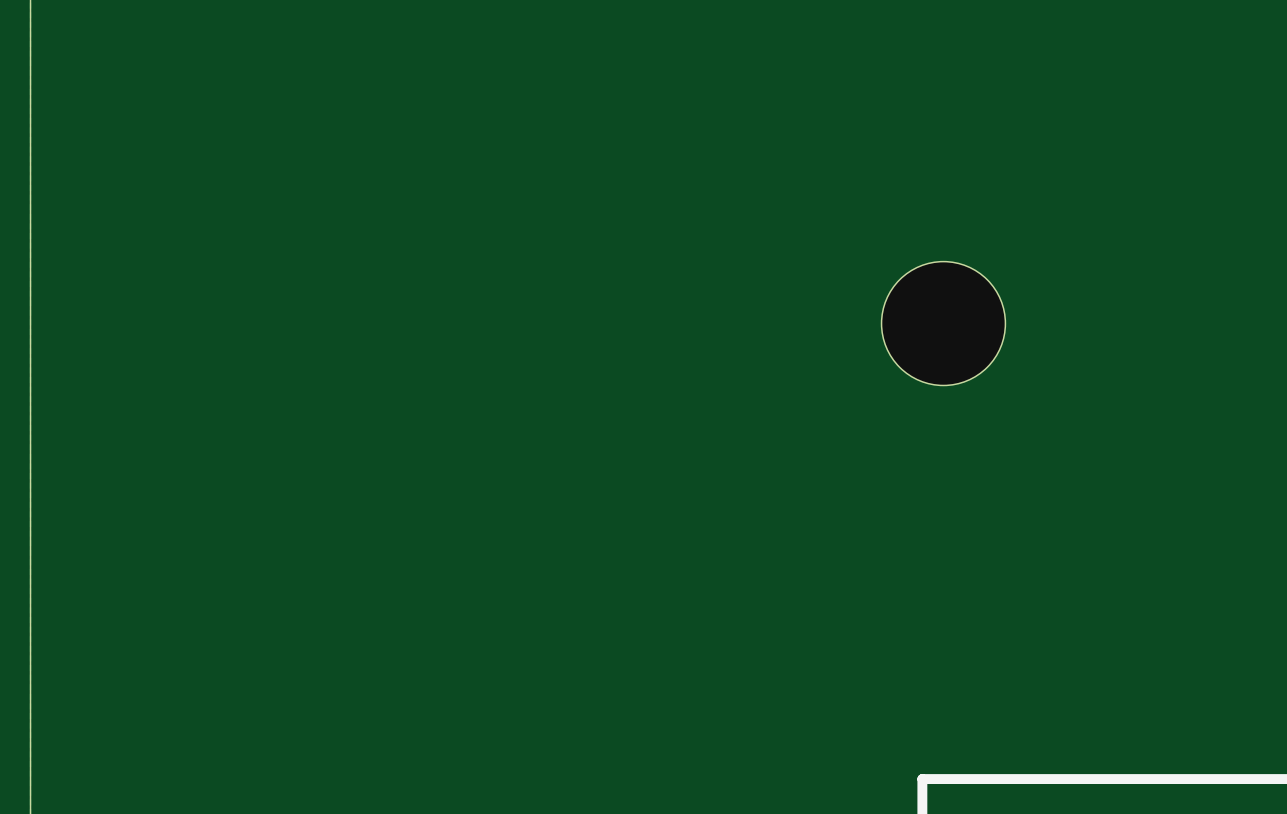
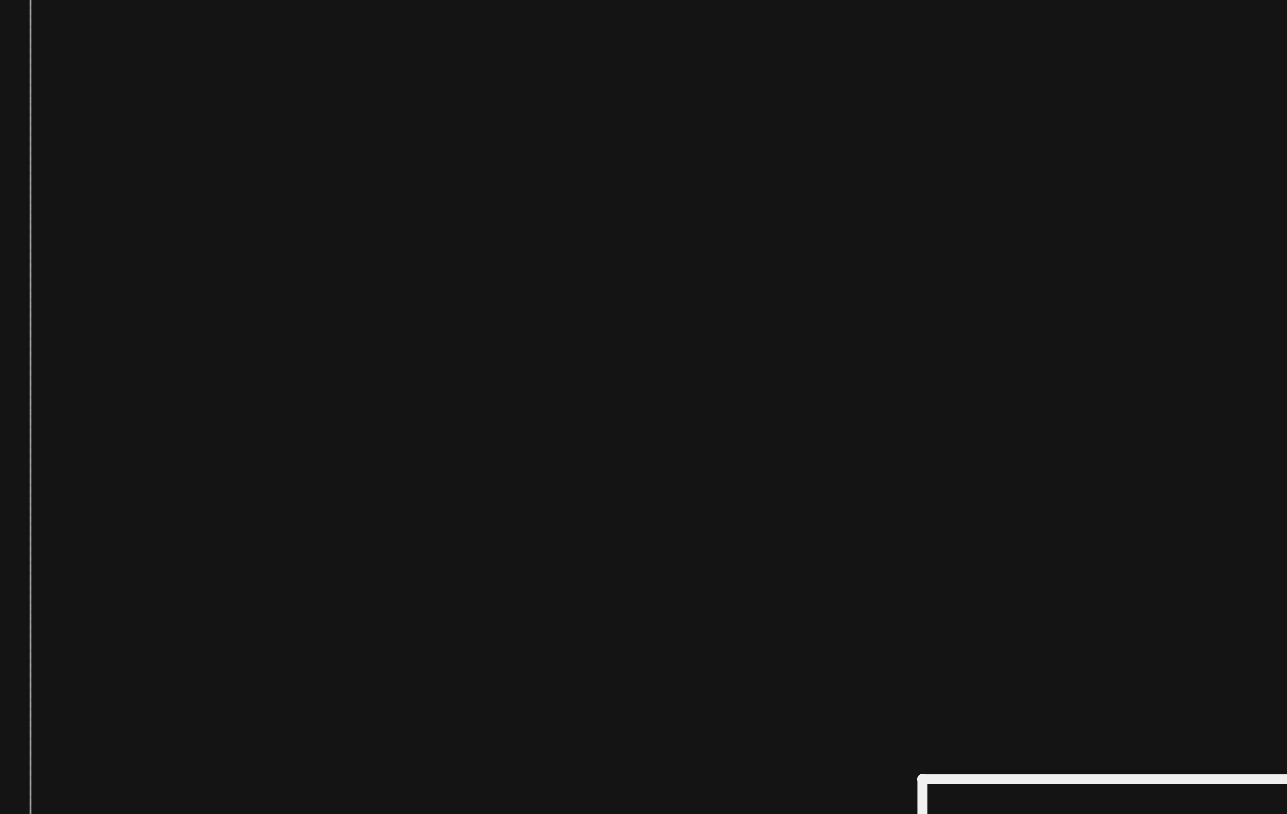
hole: (943, 323) -> none

